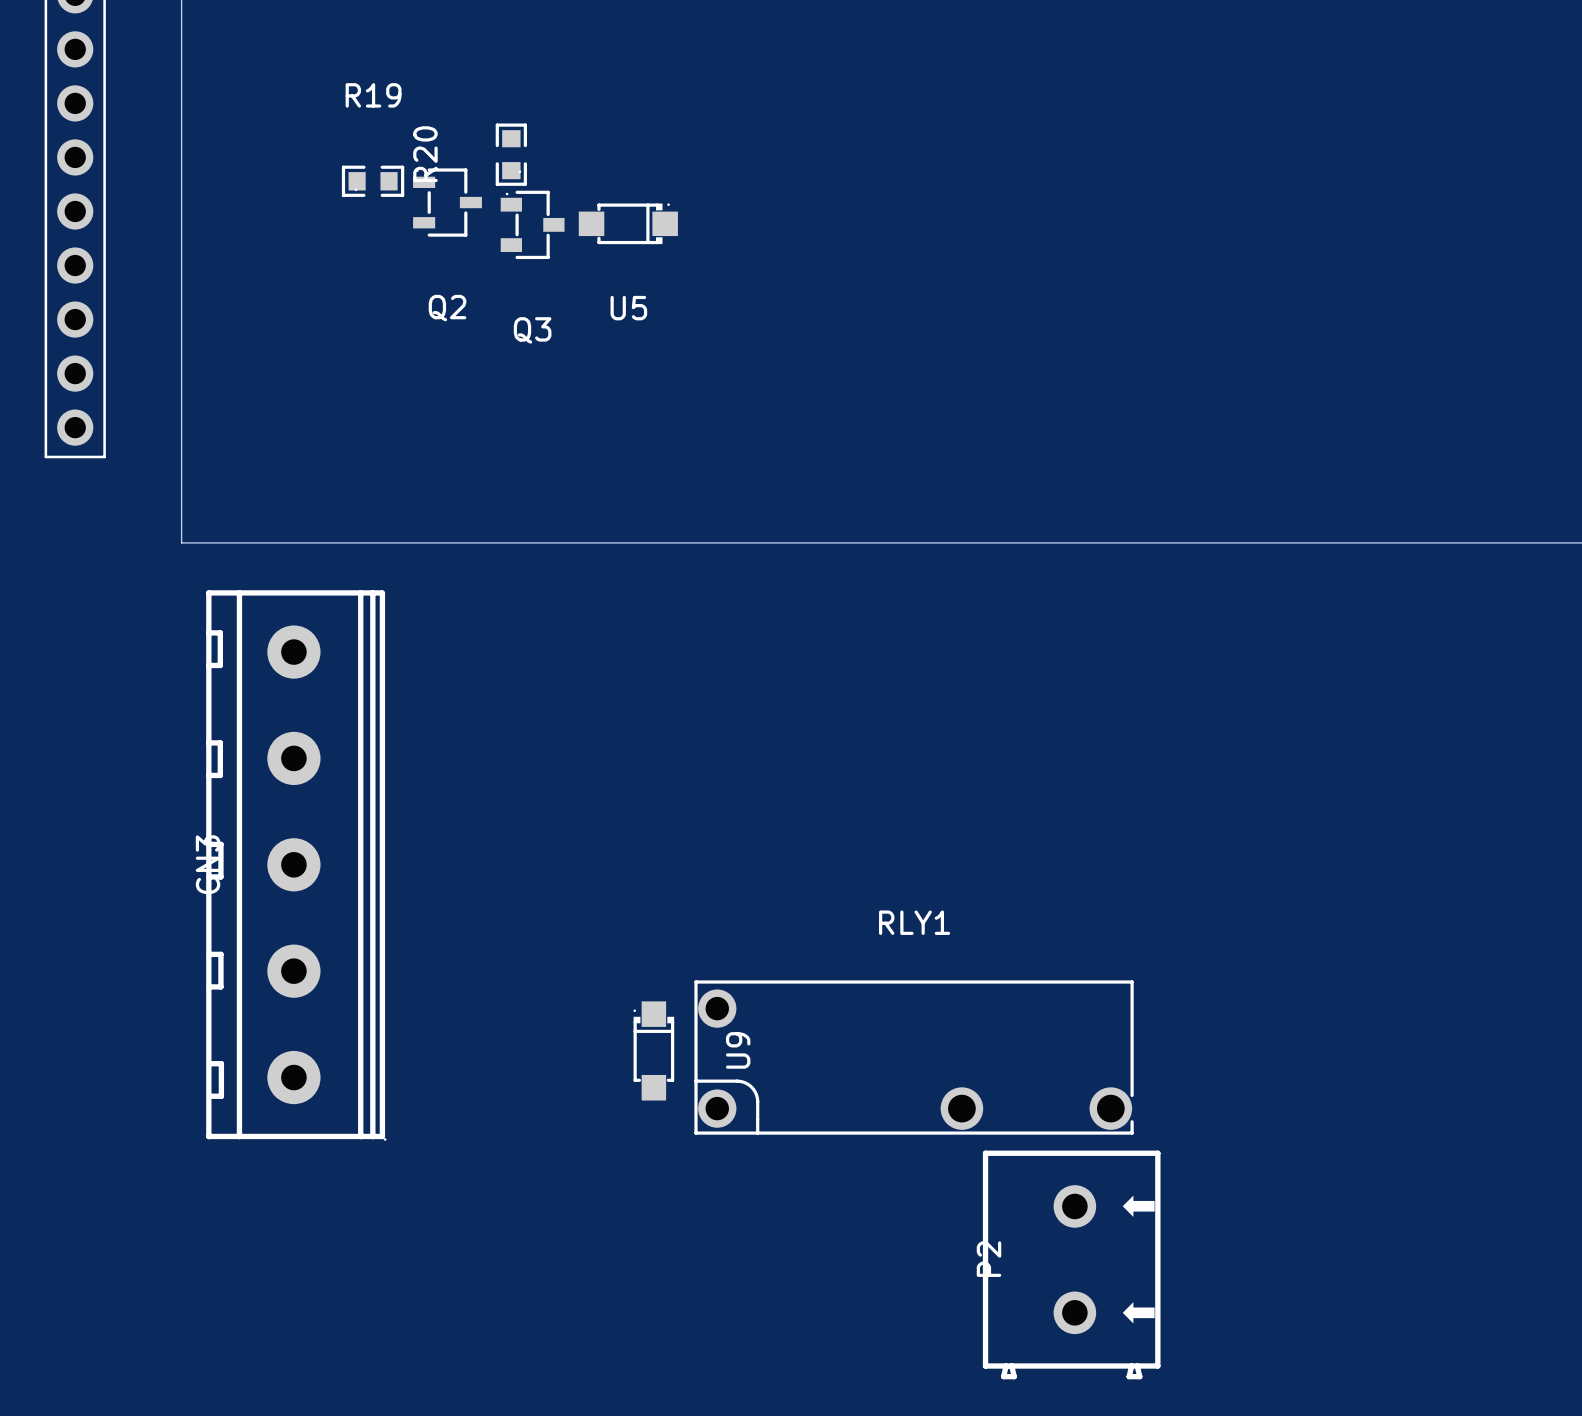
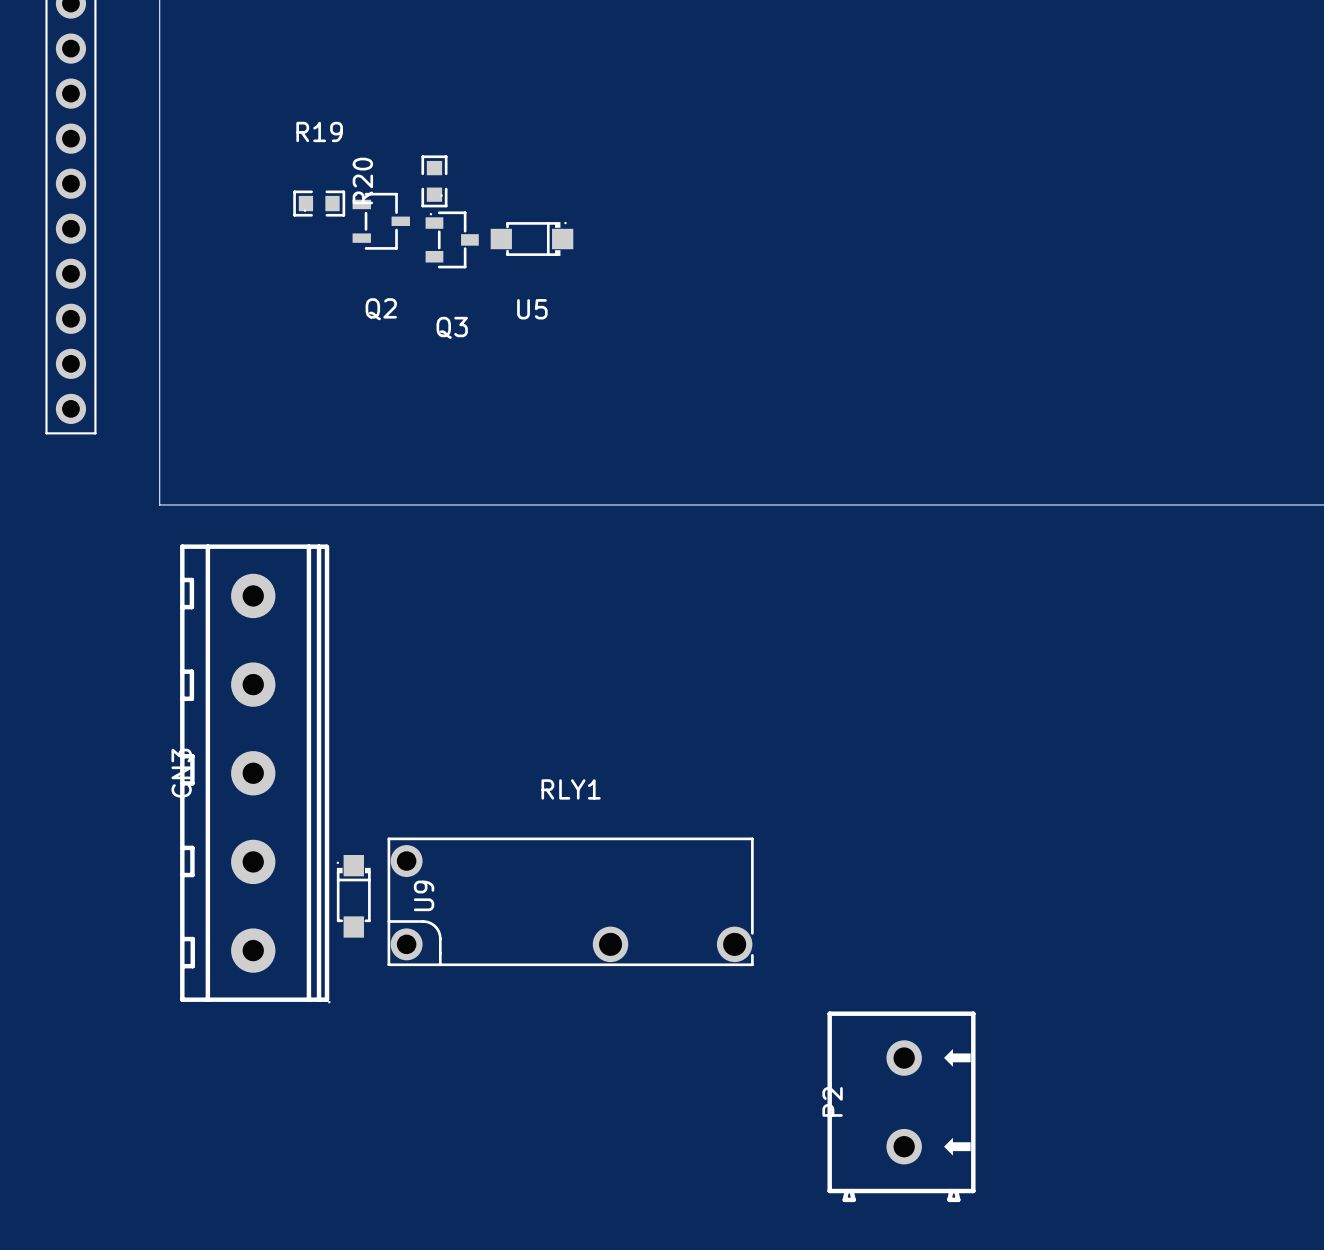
U9 position: (653, 1050) -> (353, 896)
RLY1 position: (914, 1057) -> (570, 901)

